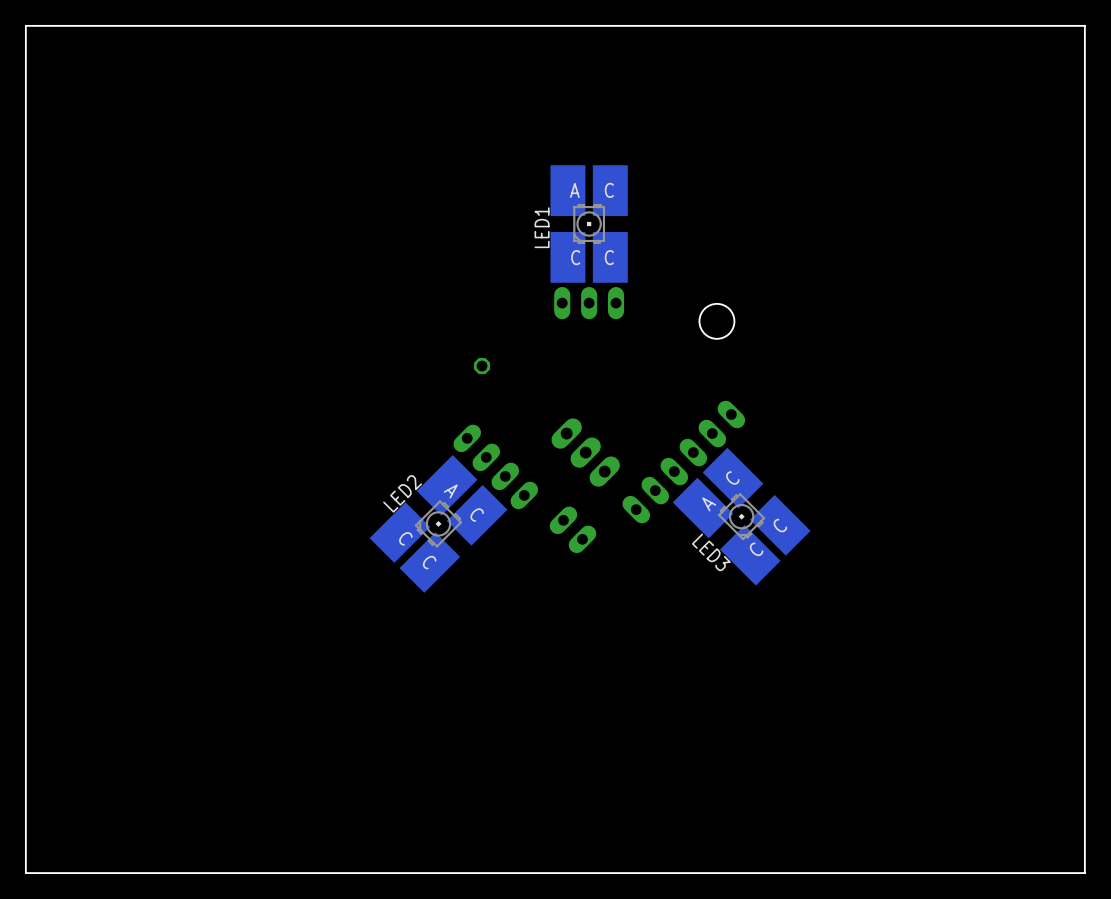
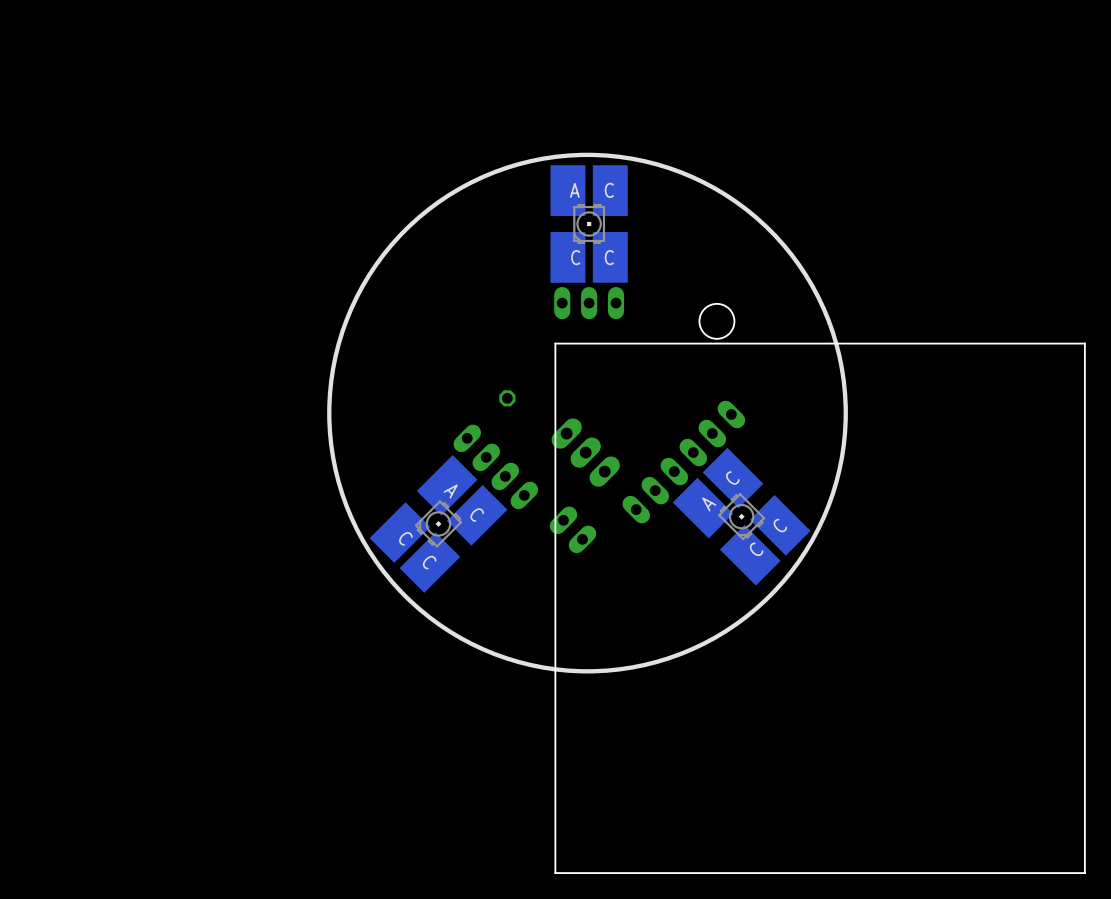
drawing: none -> [327, 152, 848, 674]
LED1 name: LED1 (542, 227) -> none
board edge: (1084, 343) (1084, 25) (25, 25) (25, 873) (555, 873) -> (1084, 343) (555, 343) (555, 873)
part position: (482, 366) -> (507, 398)
LED2 name: LED2 (402, 493) -> none
LED3 name: LED3 (711, 552) -> none

